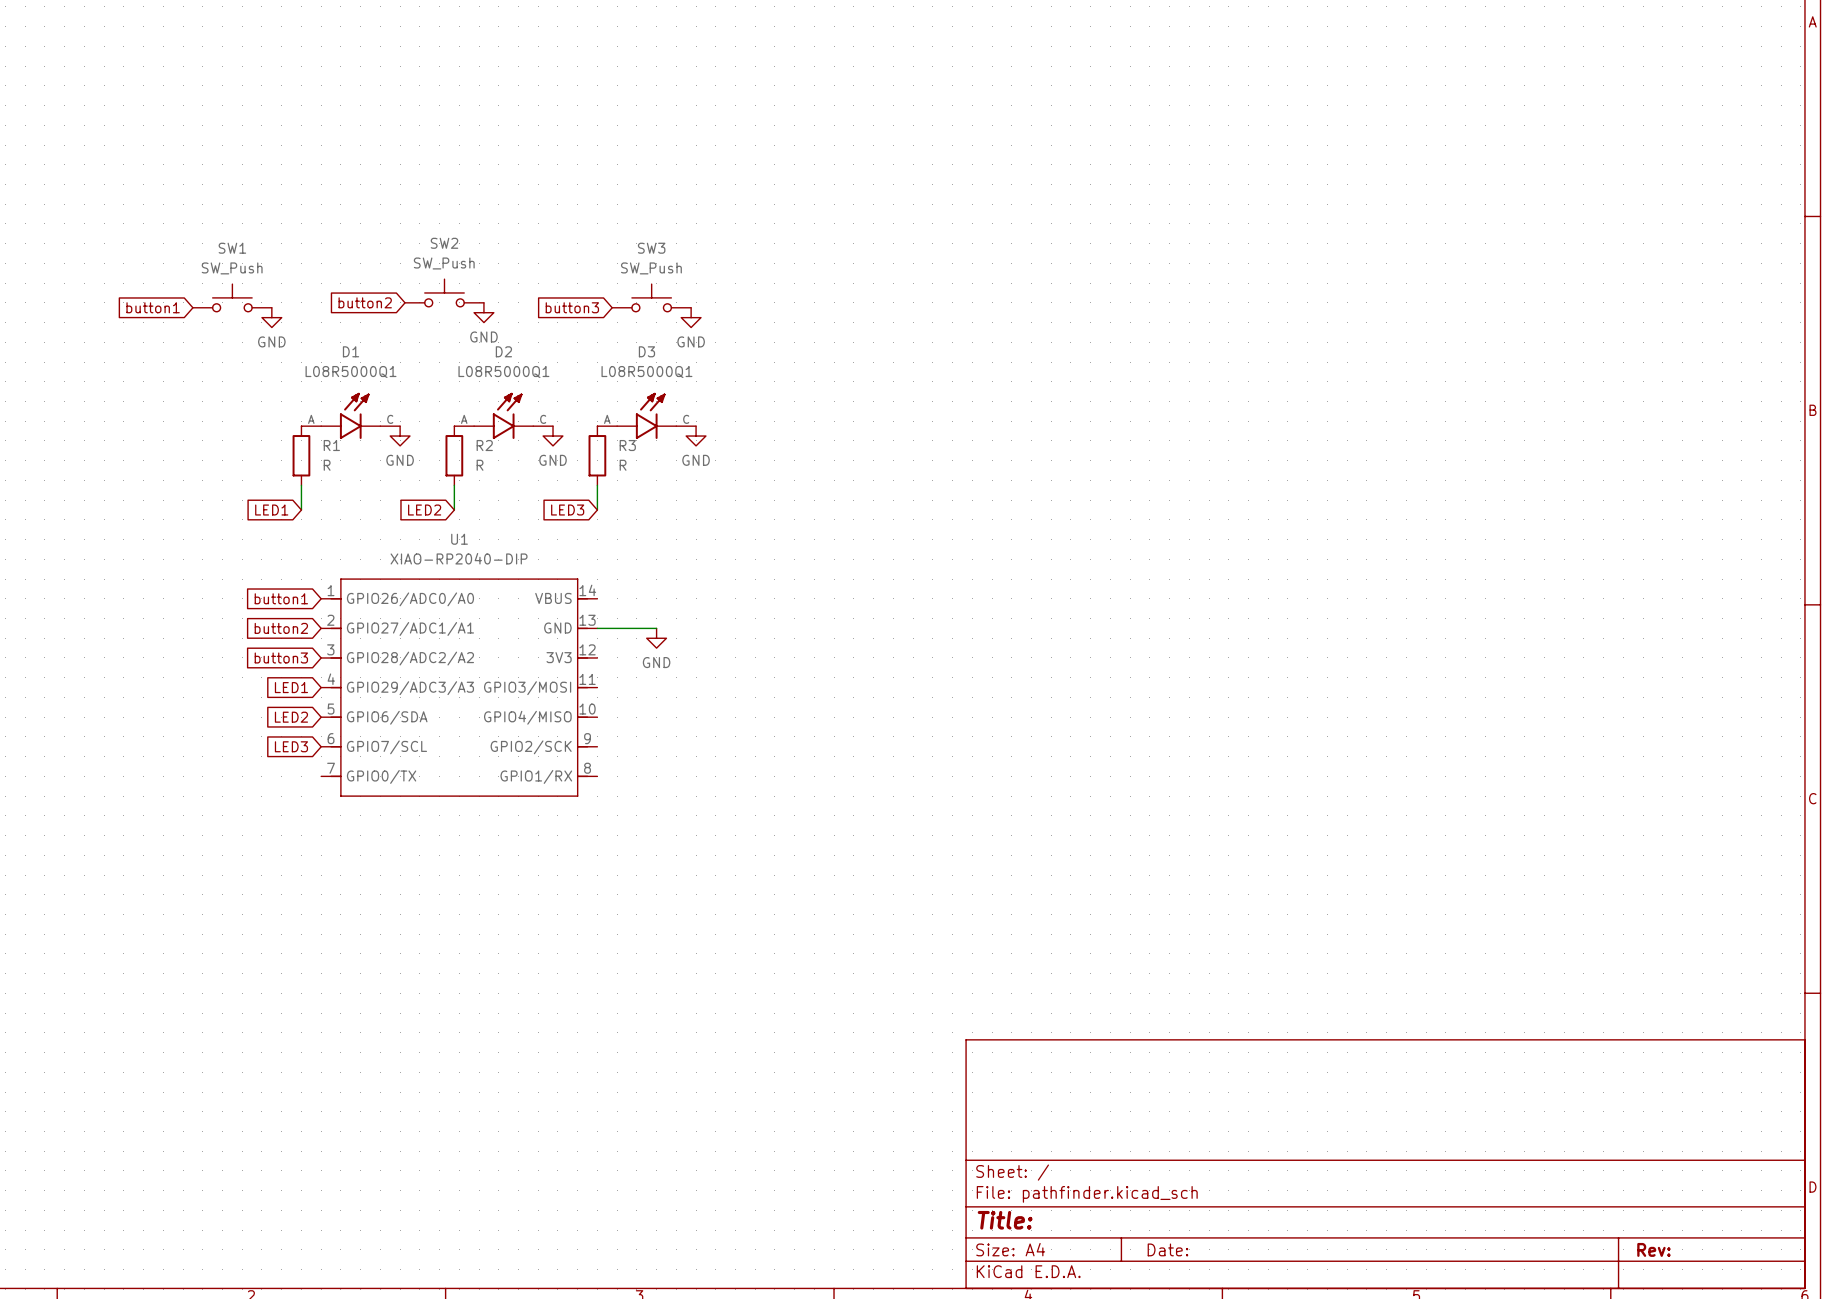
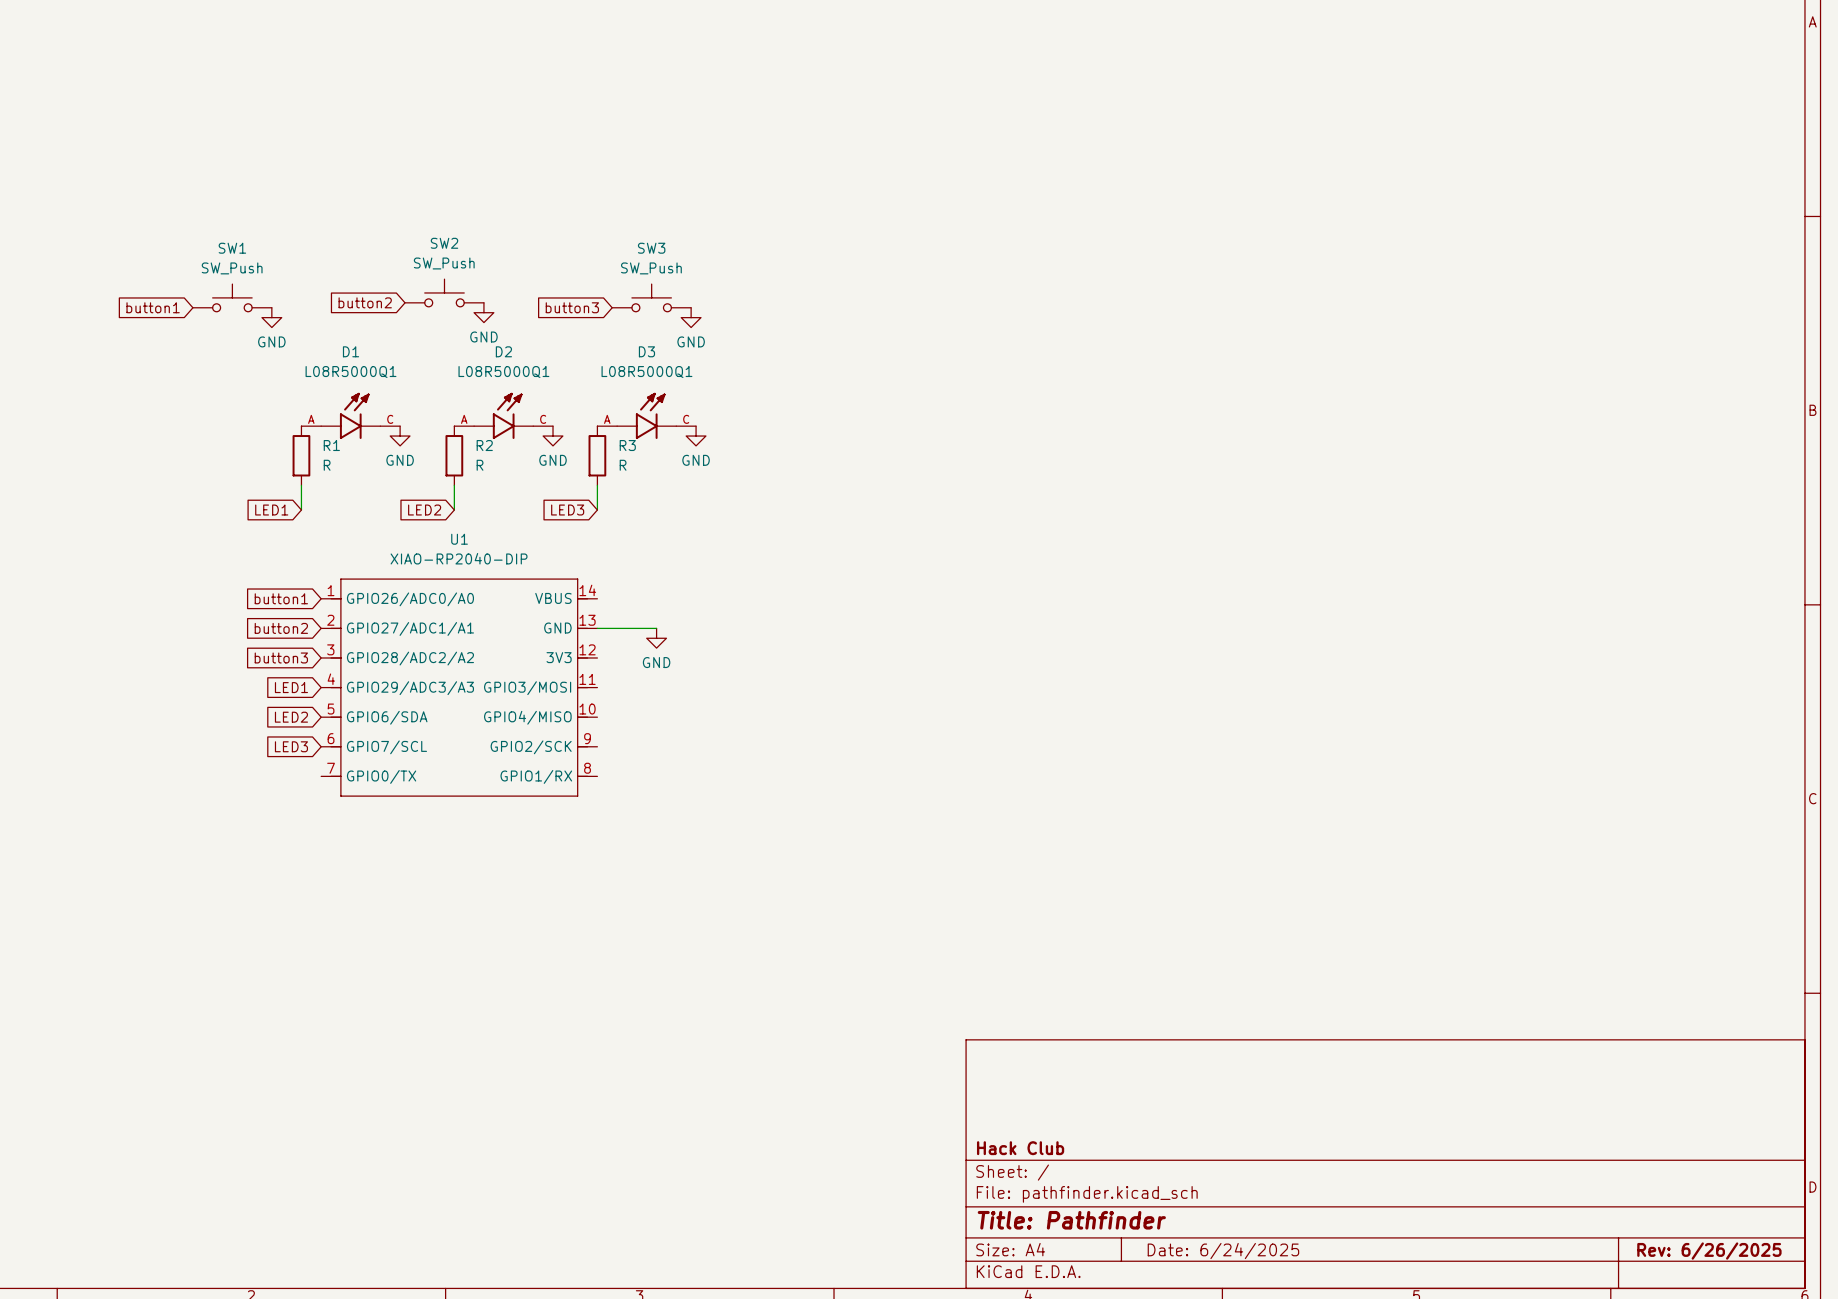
title block: none -> Hack Club (1020, 1148)
title block: Title: (1005, 1220) -> Title: Pathfinder (1071, 1220)
title block: Date: (1167, 1249) -> Date: 6/24/2025 (1223, 1251)
title block: Rev: (1653, 1249) -> Rev: 6/26/2025 (1709, 1251)

